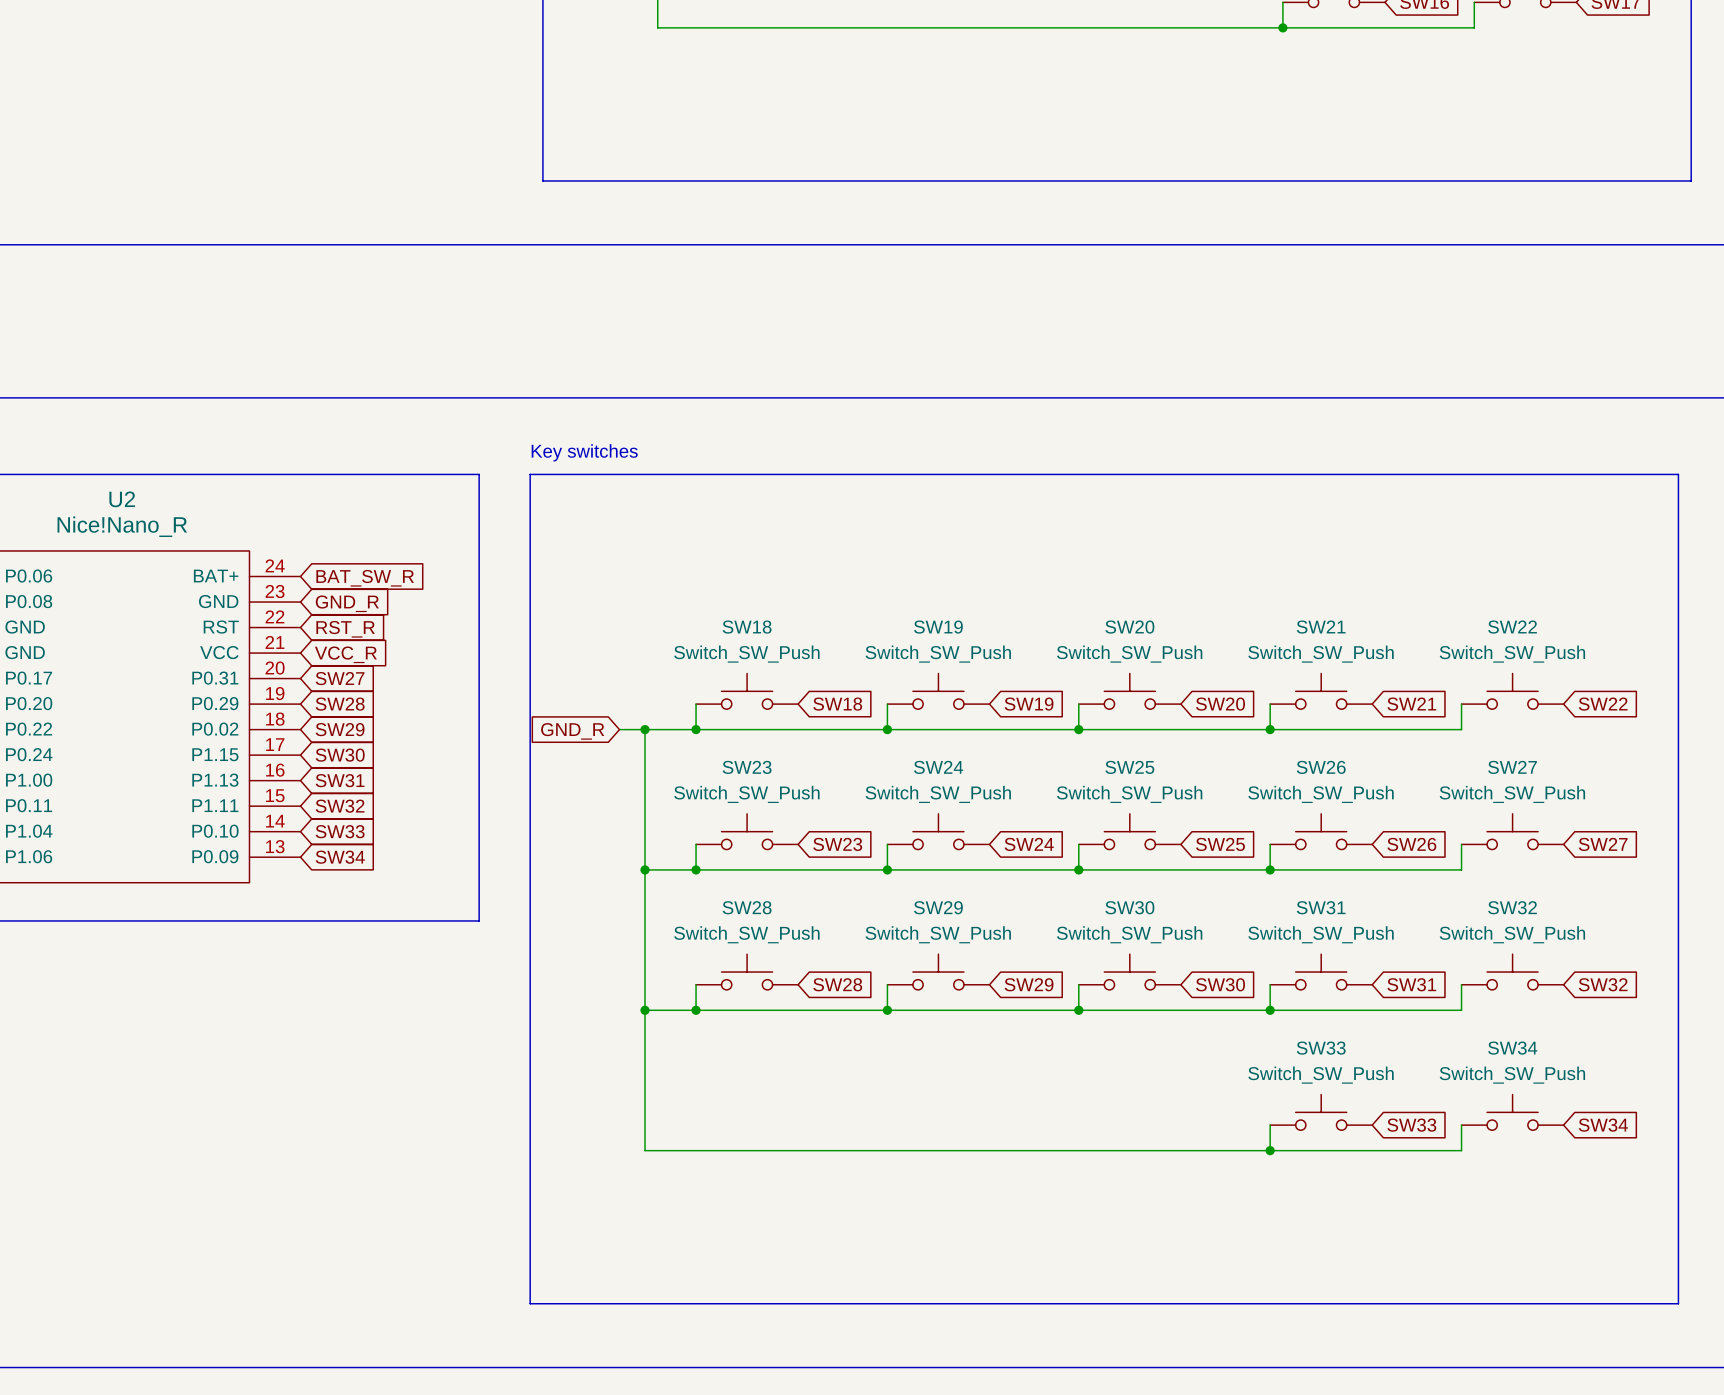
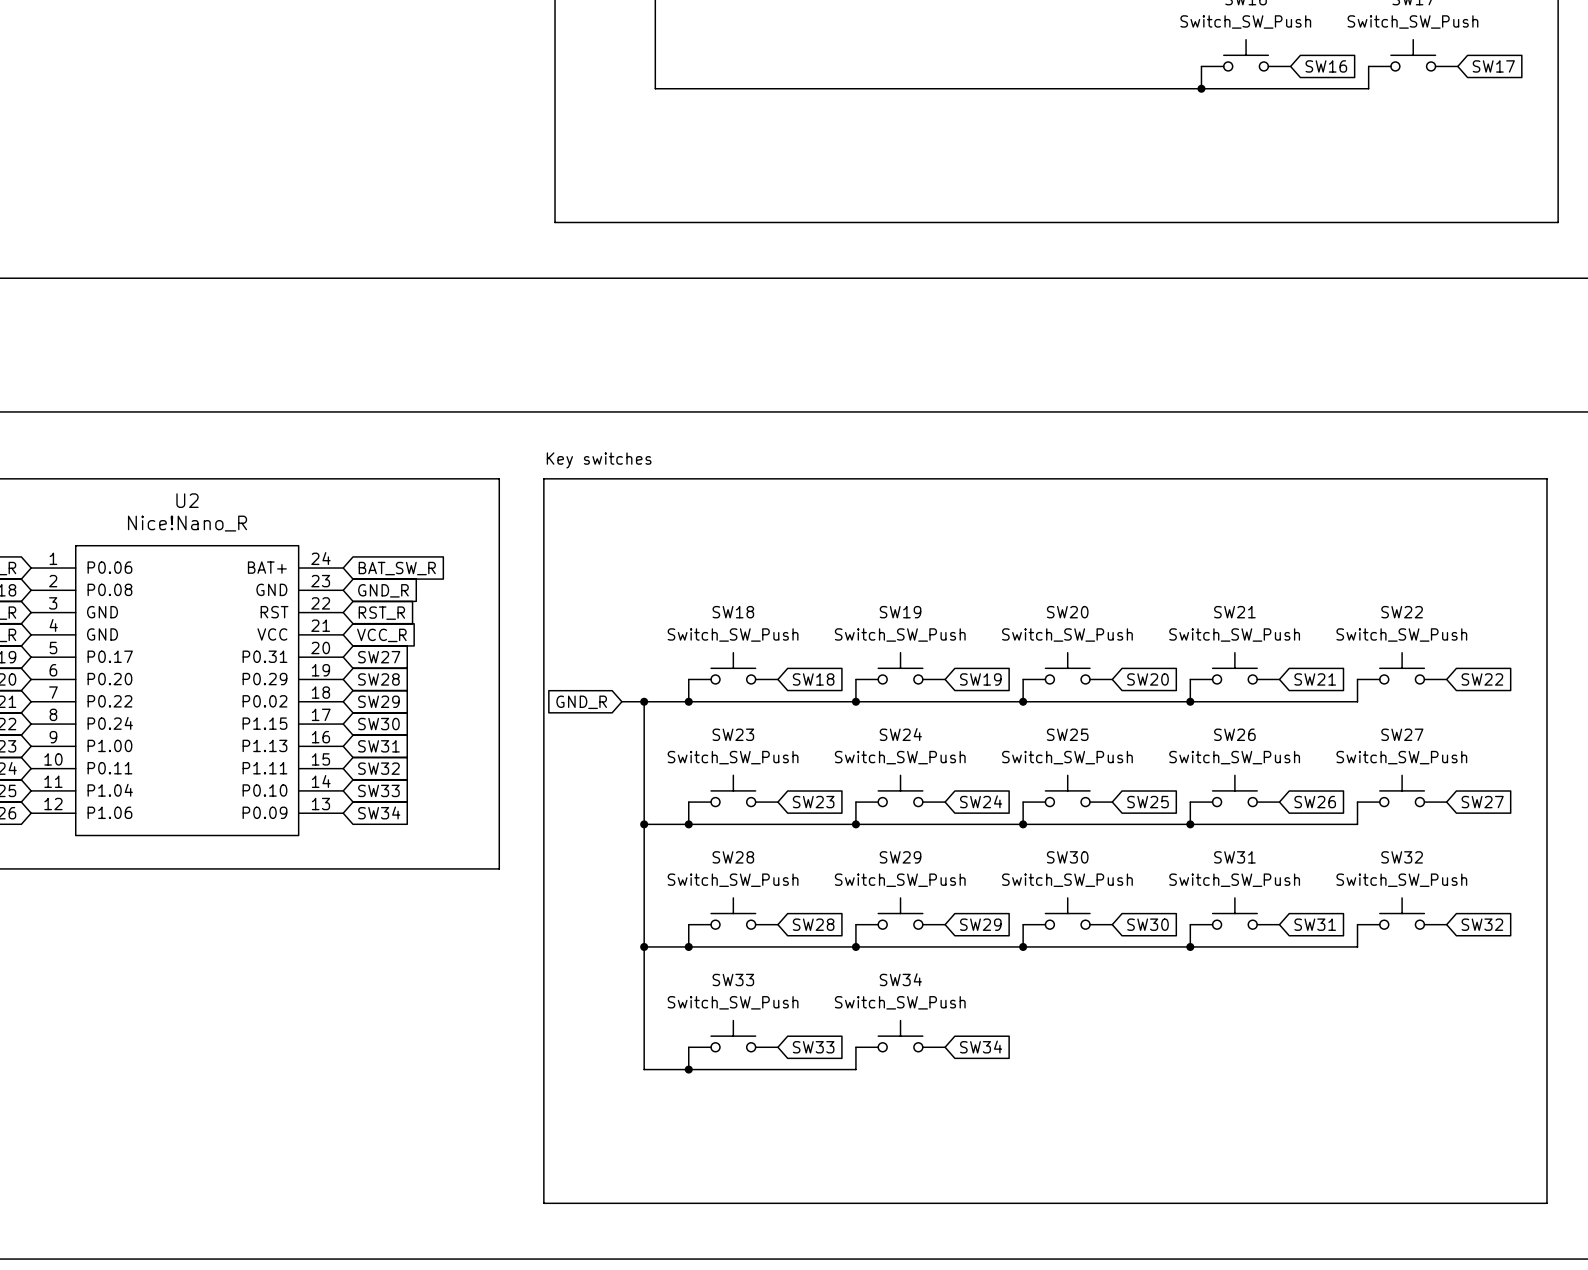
SW33 position: (1321, 1112) -> (733, 1036)
SW34 position: (1512, 1112) -> (900, 1036)
wire: none -> (688, 1047) (688, 1069)
global label: none -> SW33 (813, 1047)
global label: none -> SW34 (981, 1047)
wire: (1270, 1125) (1270, 1150) -> none
global label: SW33 (1411, 1125) -> none
wire: (1461, 1125) (1461, 1150) (887, 1150) -> (855, 1047) (855, 1069)
global label: SW34 (1603, 1125) -> none
junction: none -> (688, 1069)
junction: (1270, 1150) -> none

